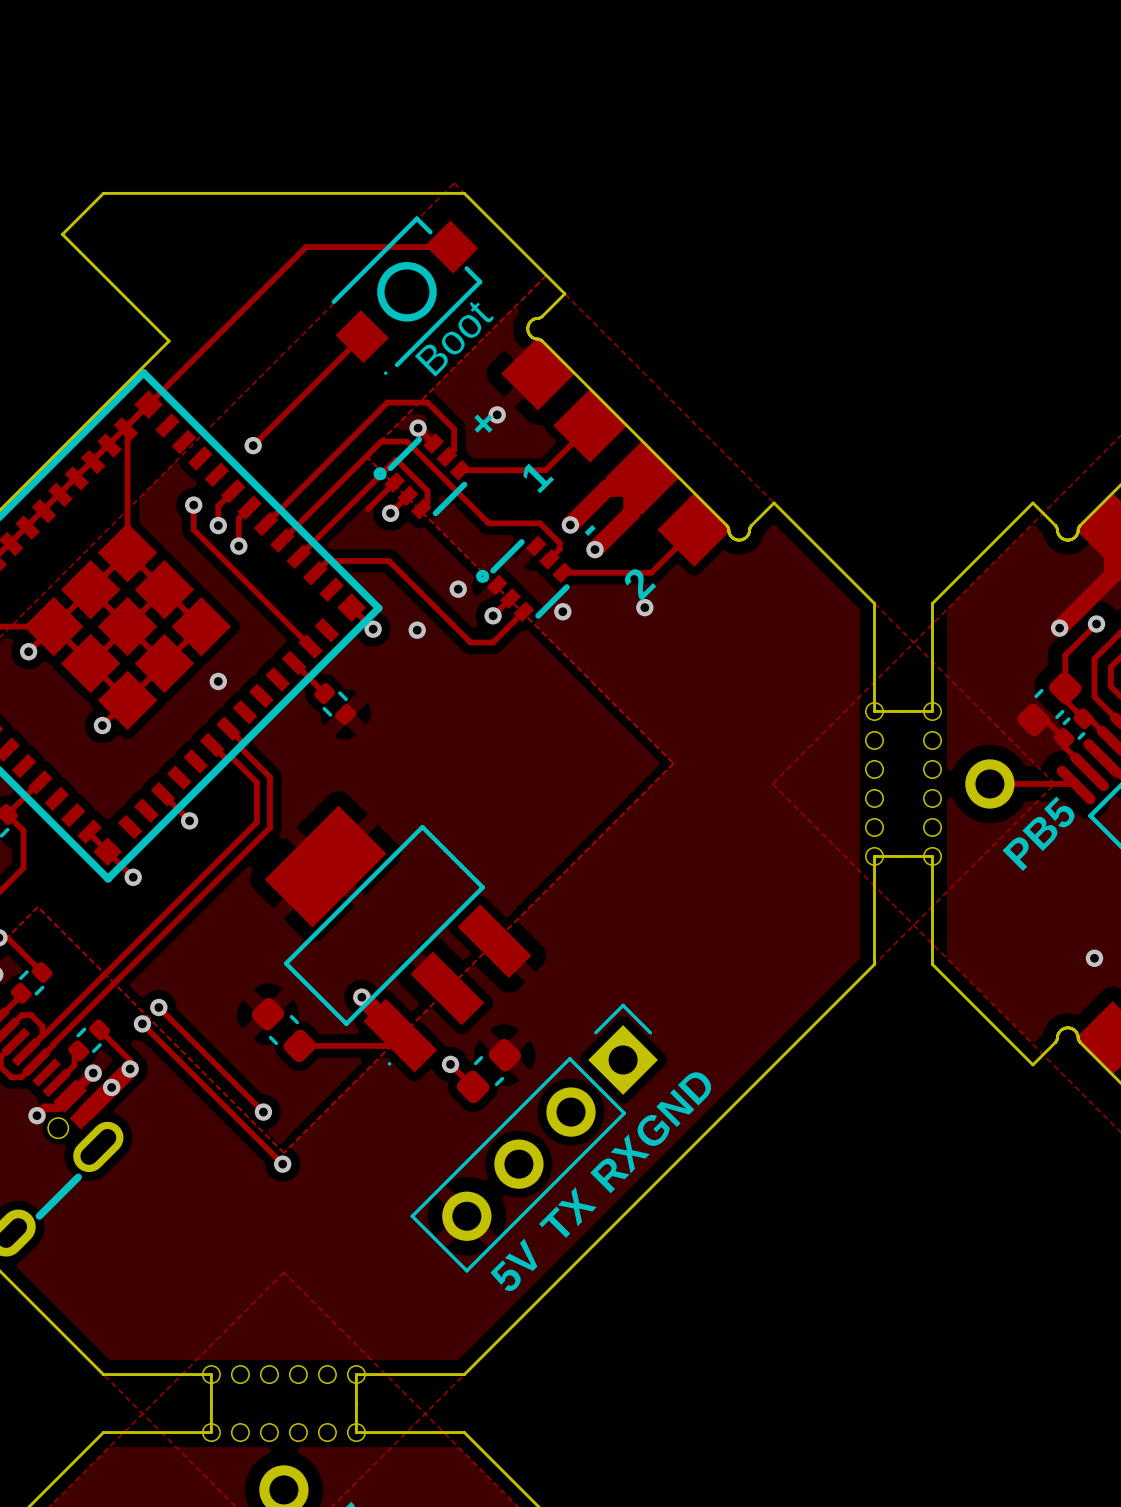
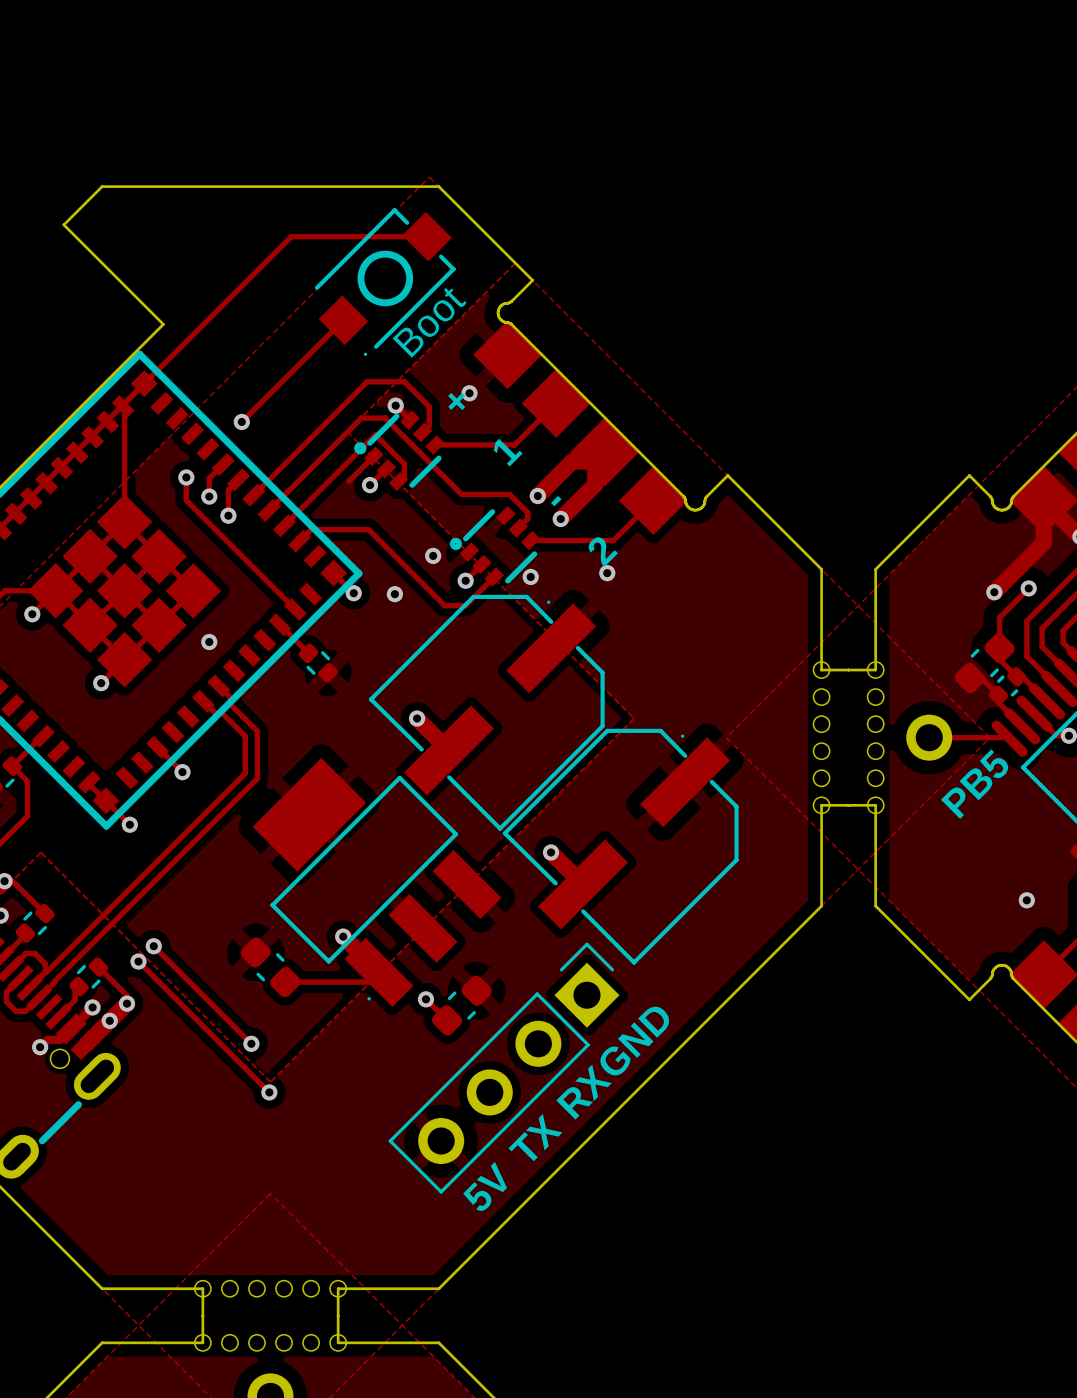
part: none -> (486, 712)
track: none -> (417, 718) (449, 750)
via: none -> (417, 718)
part: none -> (620, 846)
track: none -> (551, 852) (582, 884)
via: none -> (551, 852)

